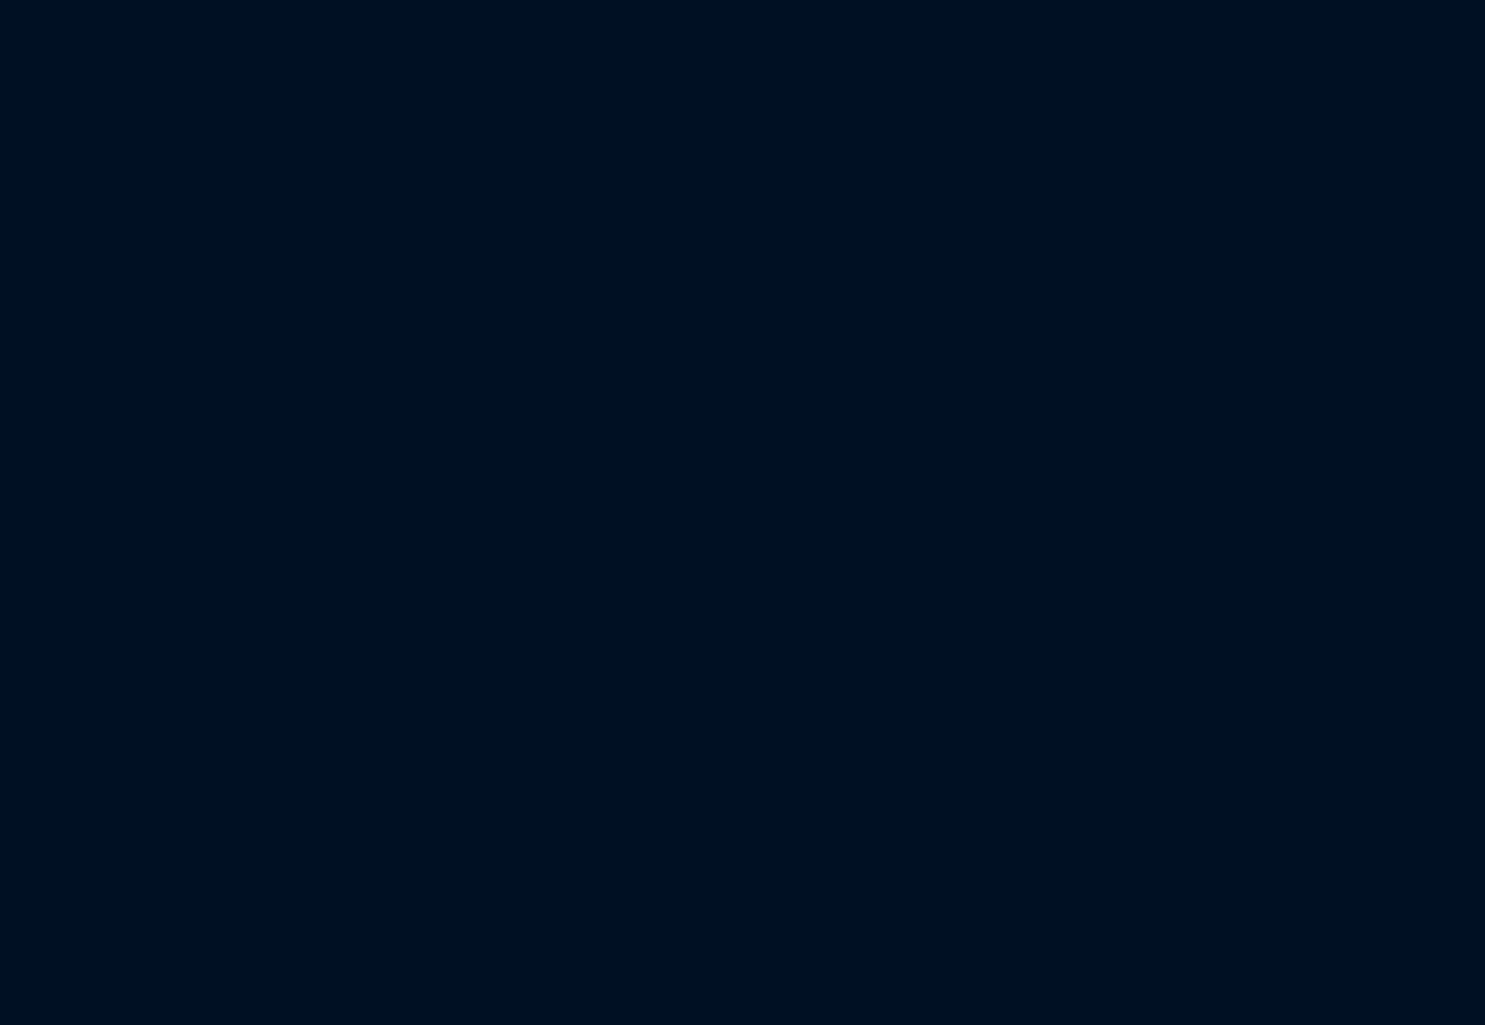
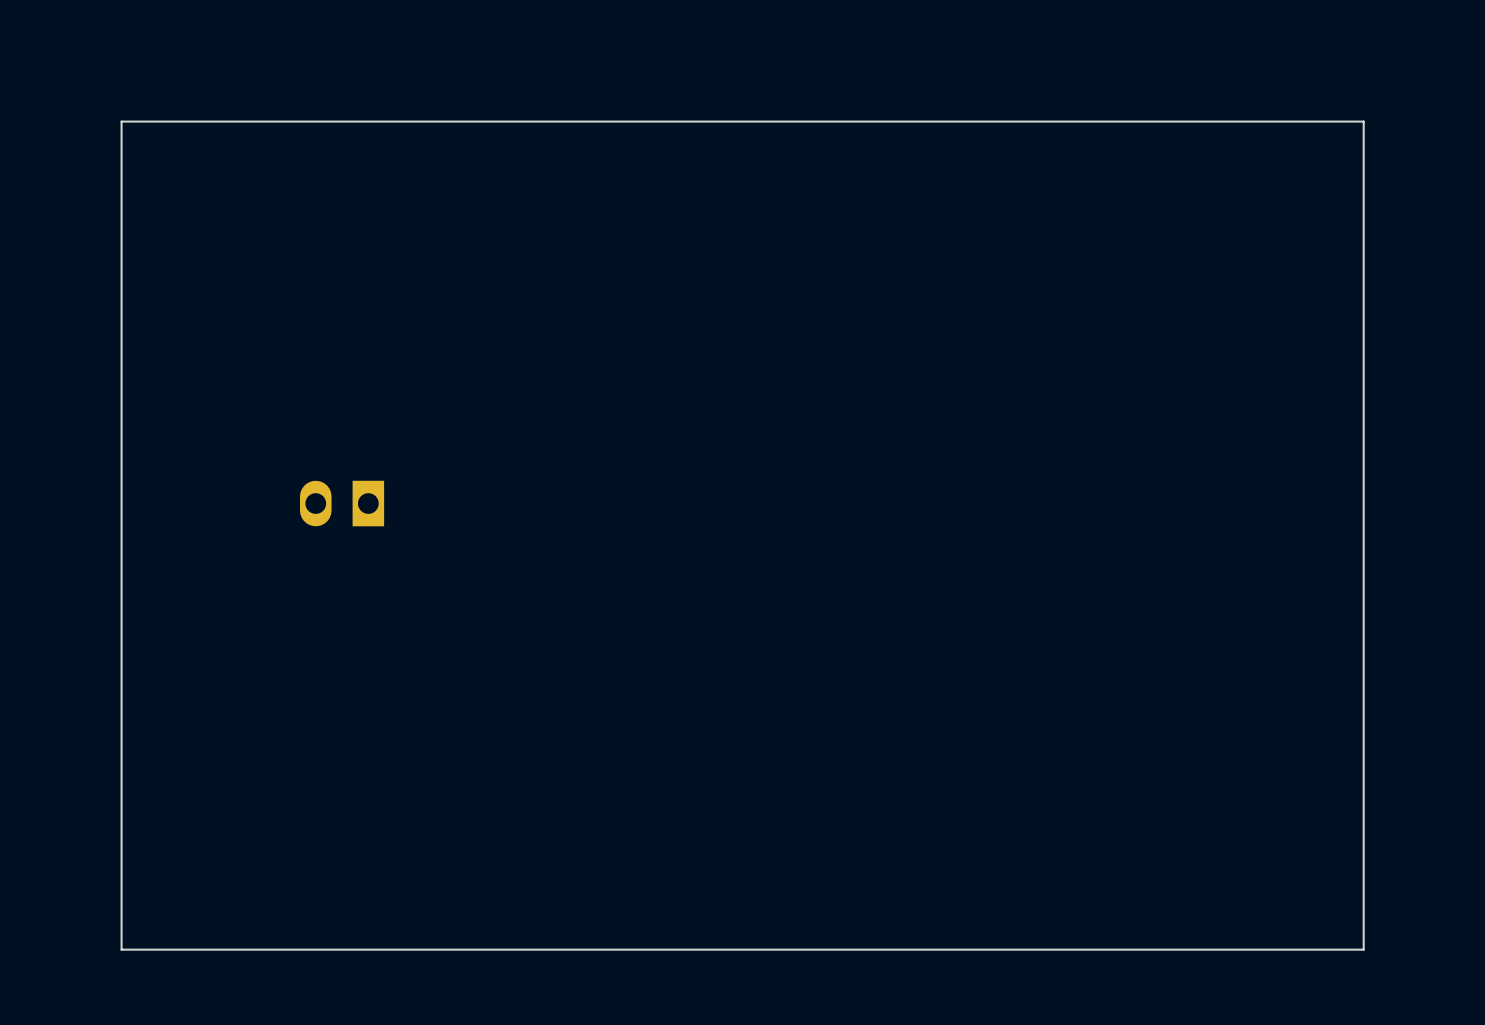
board edge: none -> (1363, 121) (121, 121) (121, 949) (1363, 949) (1363, 121)
part: none -> (342, 503)

